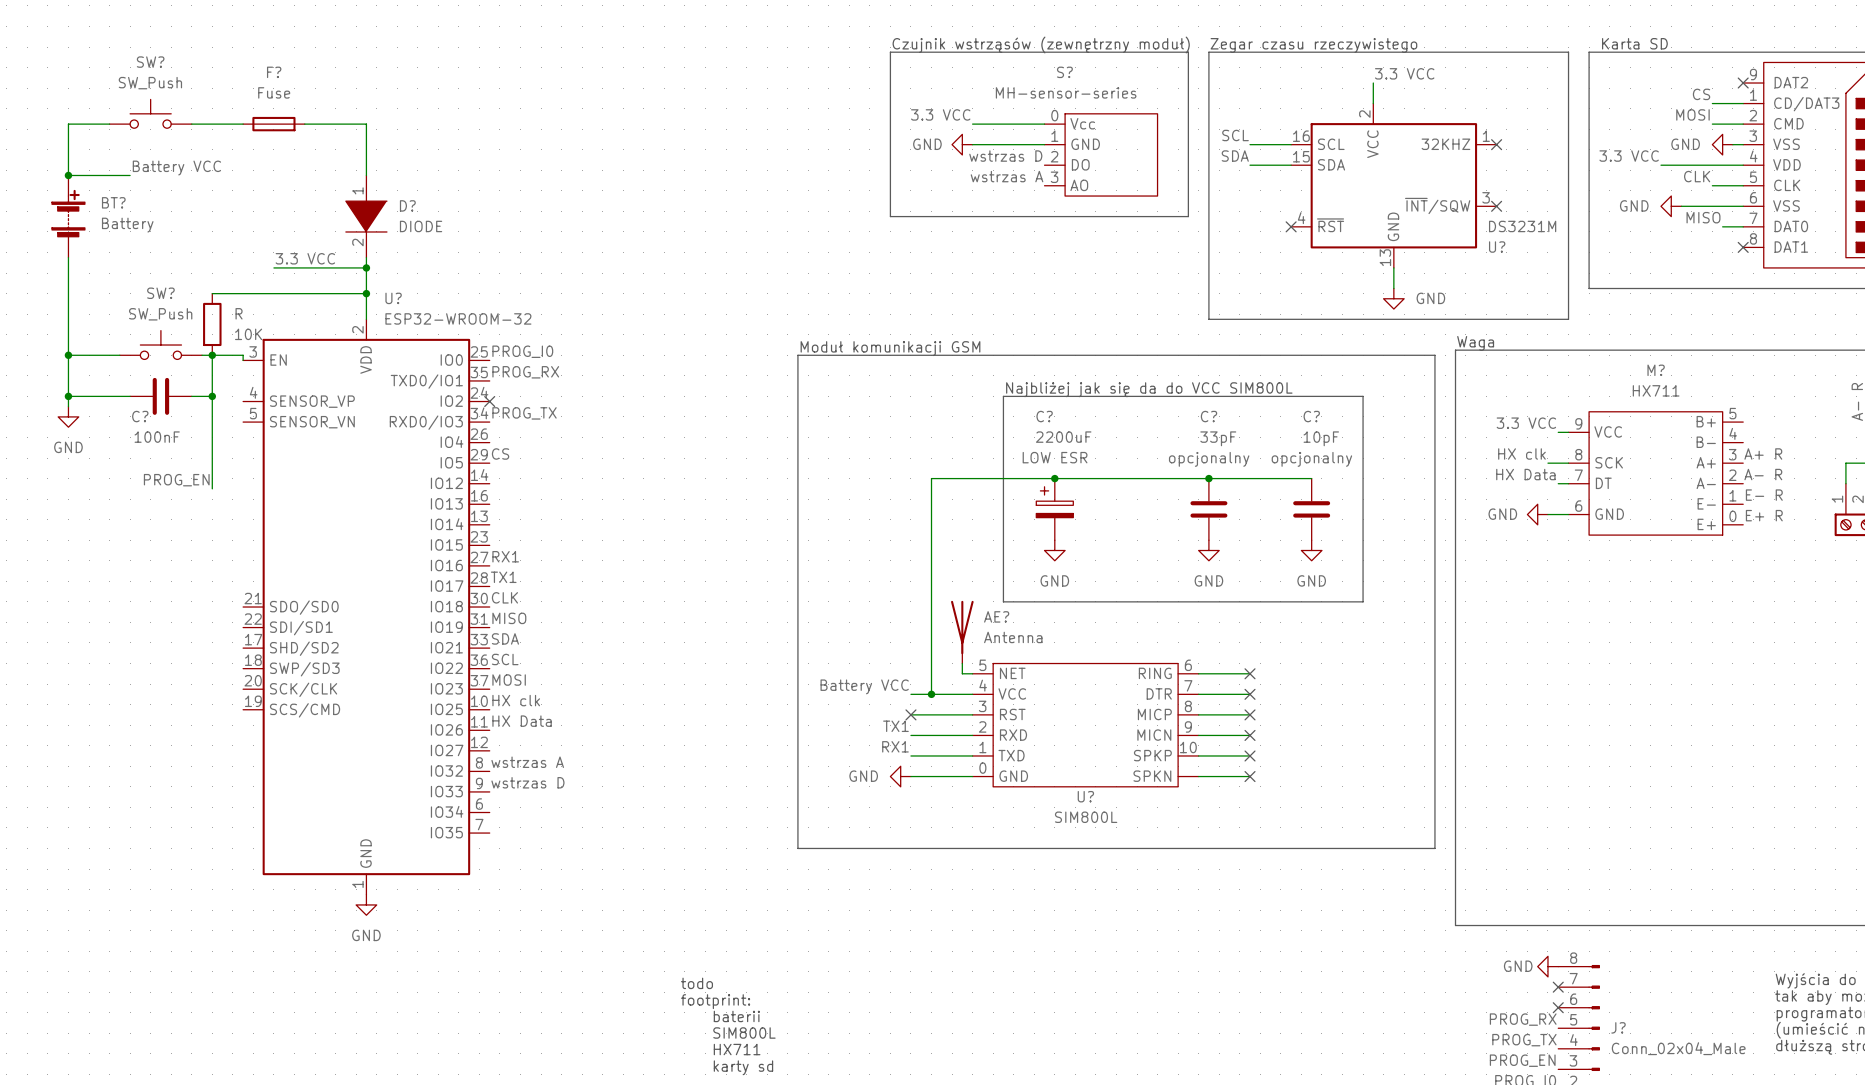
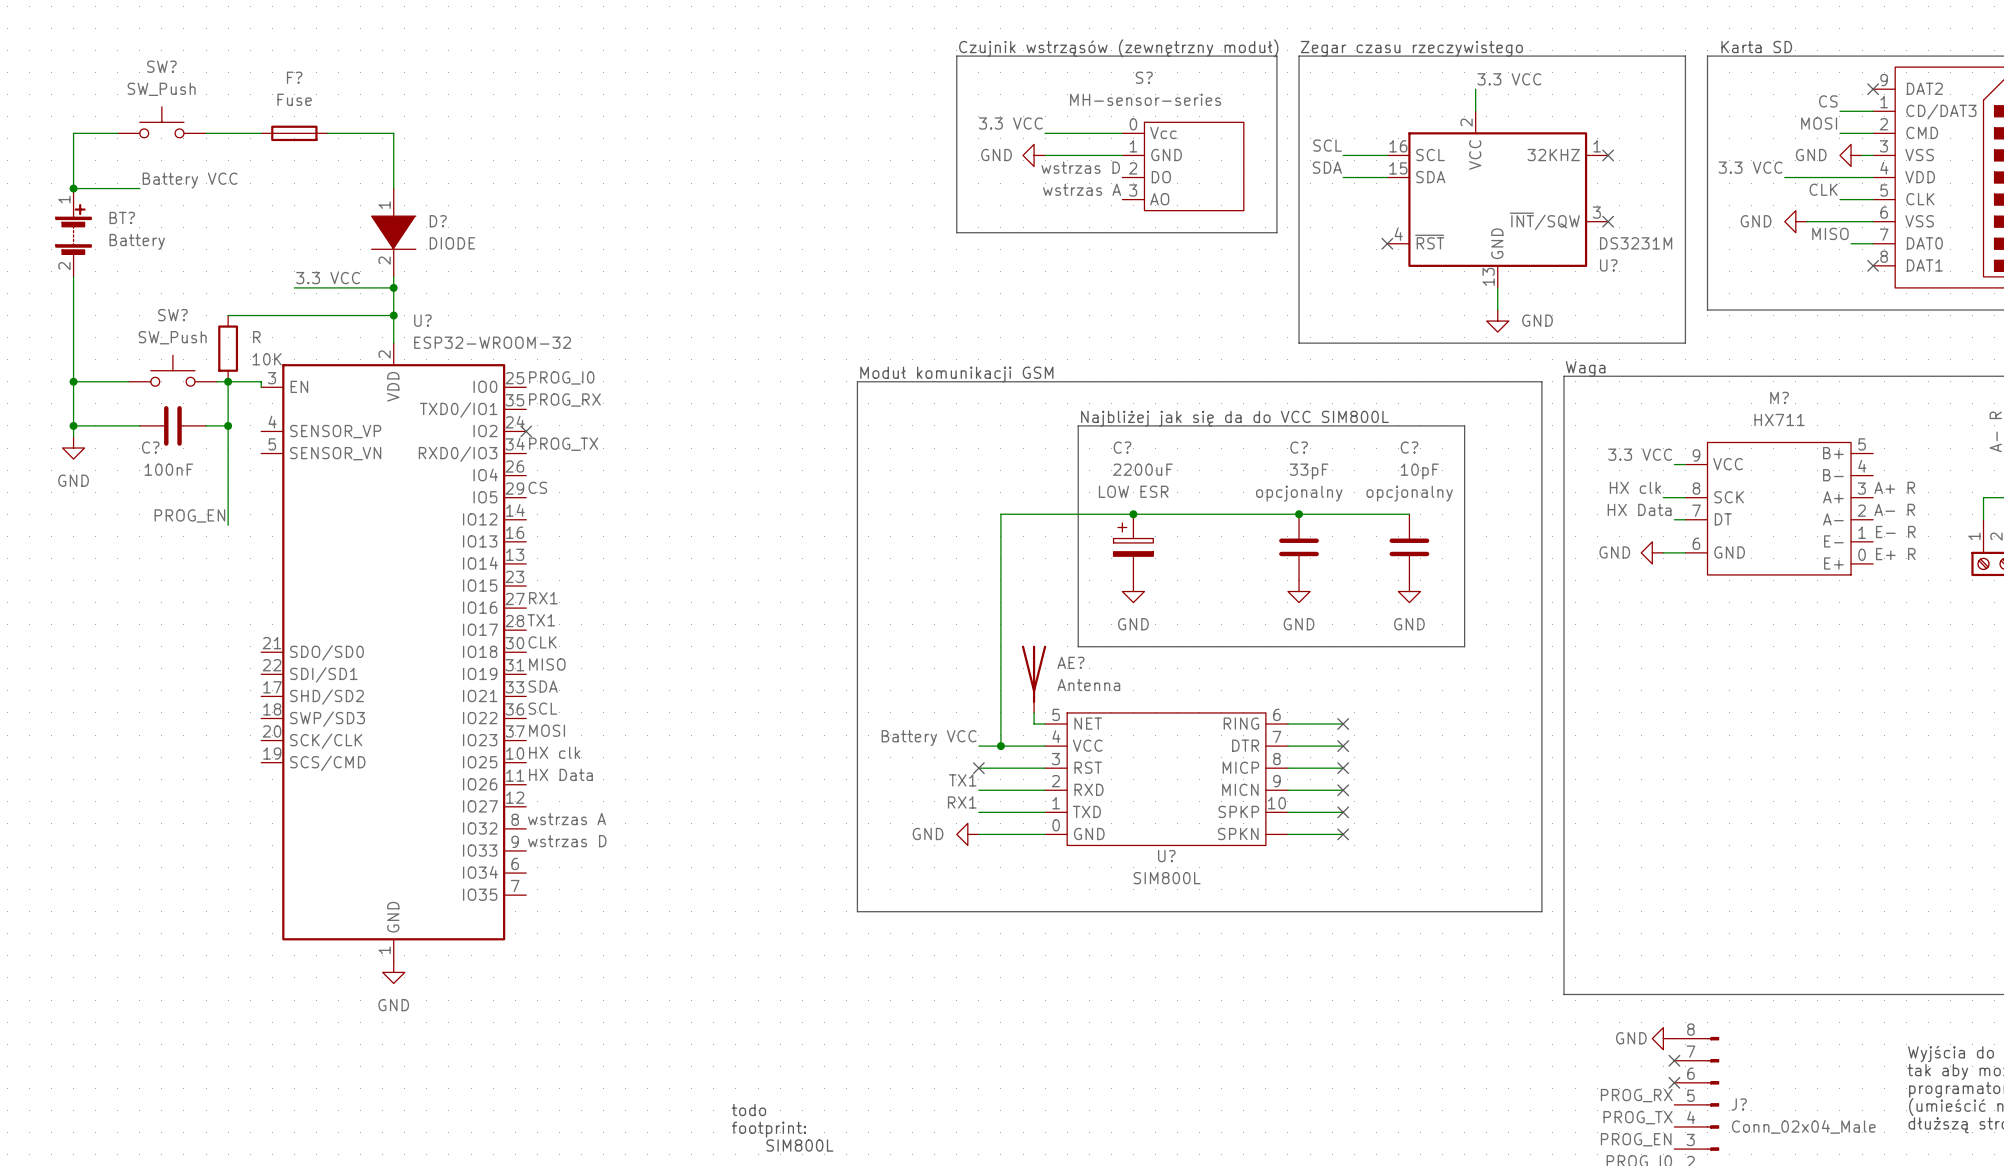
BT? pin number: none -> 1 (64, 199)
BT? pin number: none -> 2 (64, 266)
text: todo (696, 983) -> none
text: footprint: (715, 1001) -> none
text: baterii (736, 1016) -> none
text: SIM800L (744, 1033) -> todo (748, 1109)
text: HX711 (737, 1049) -> footprint: (768, 1129)
text: karty sd (743, 1067) -> SIM800L (799, 1145)

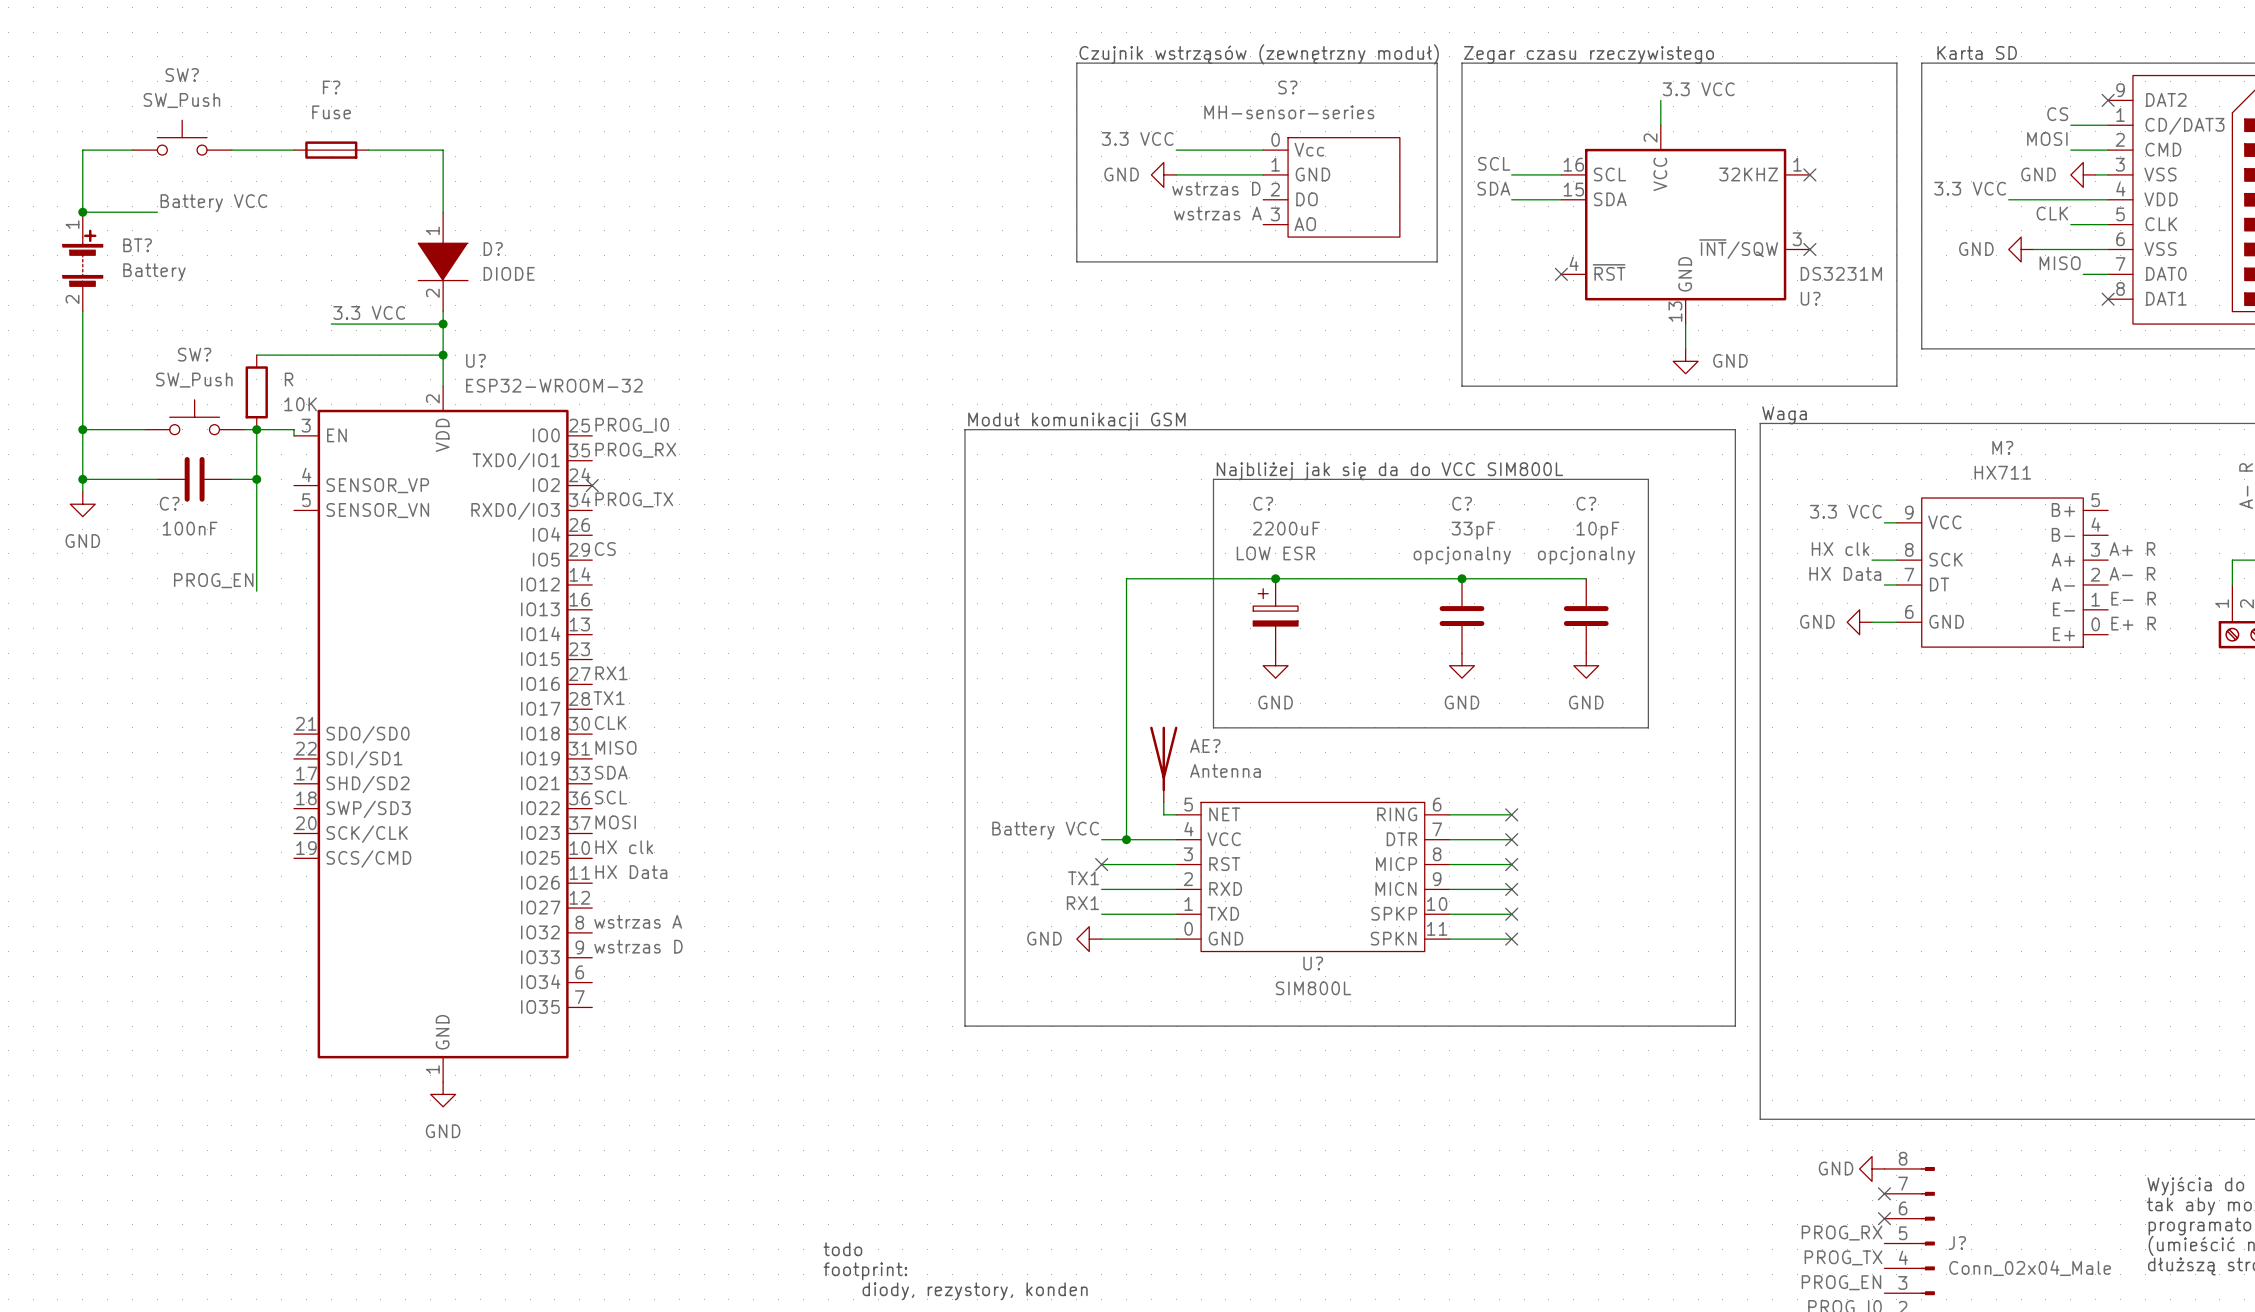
U? pin number: none -> 11 (1437, 928)
text: SIM800L (799, 1145) -> diody, rezystory, konden (975, 1291)

